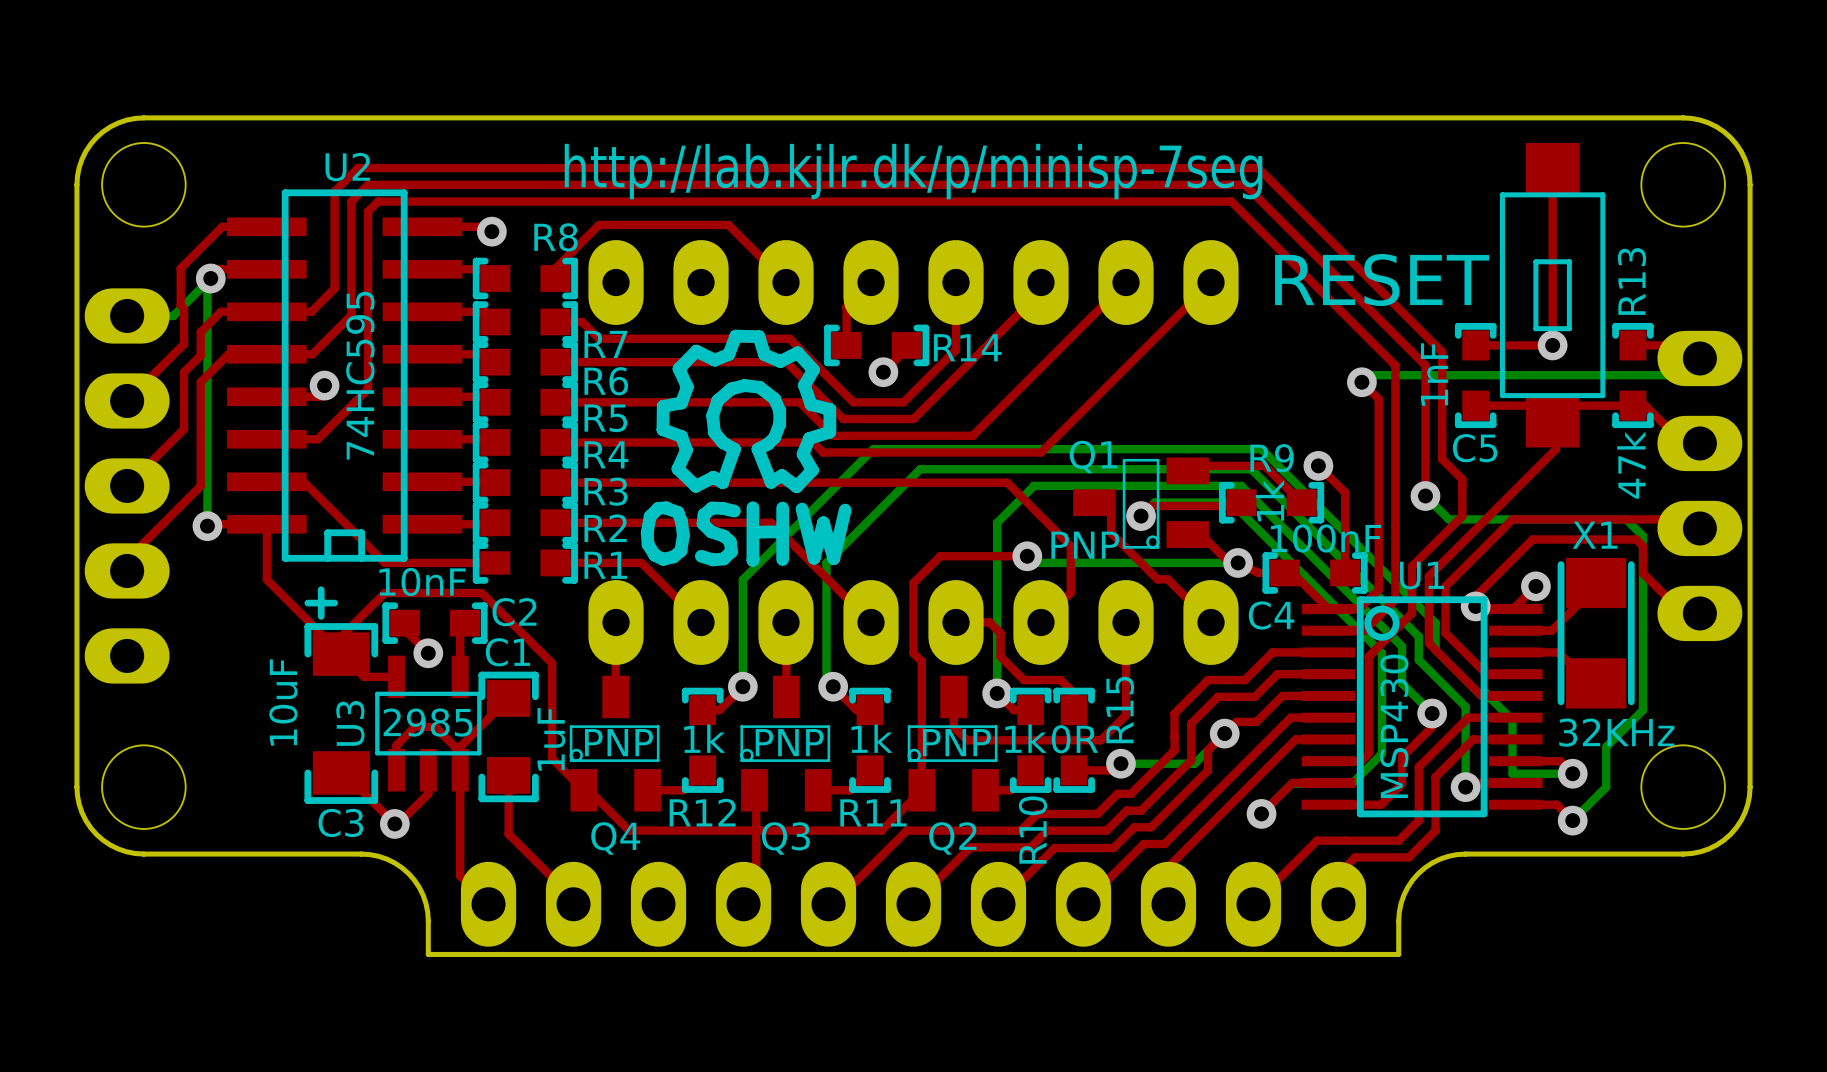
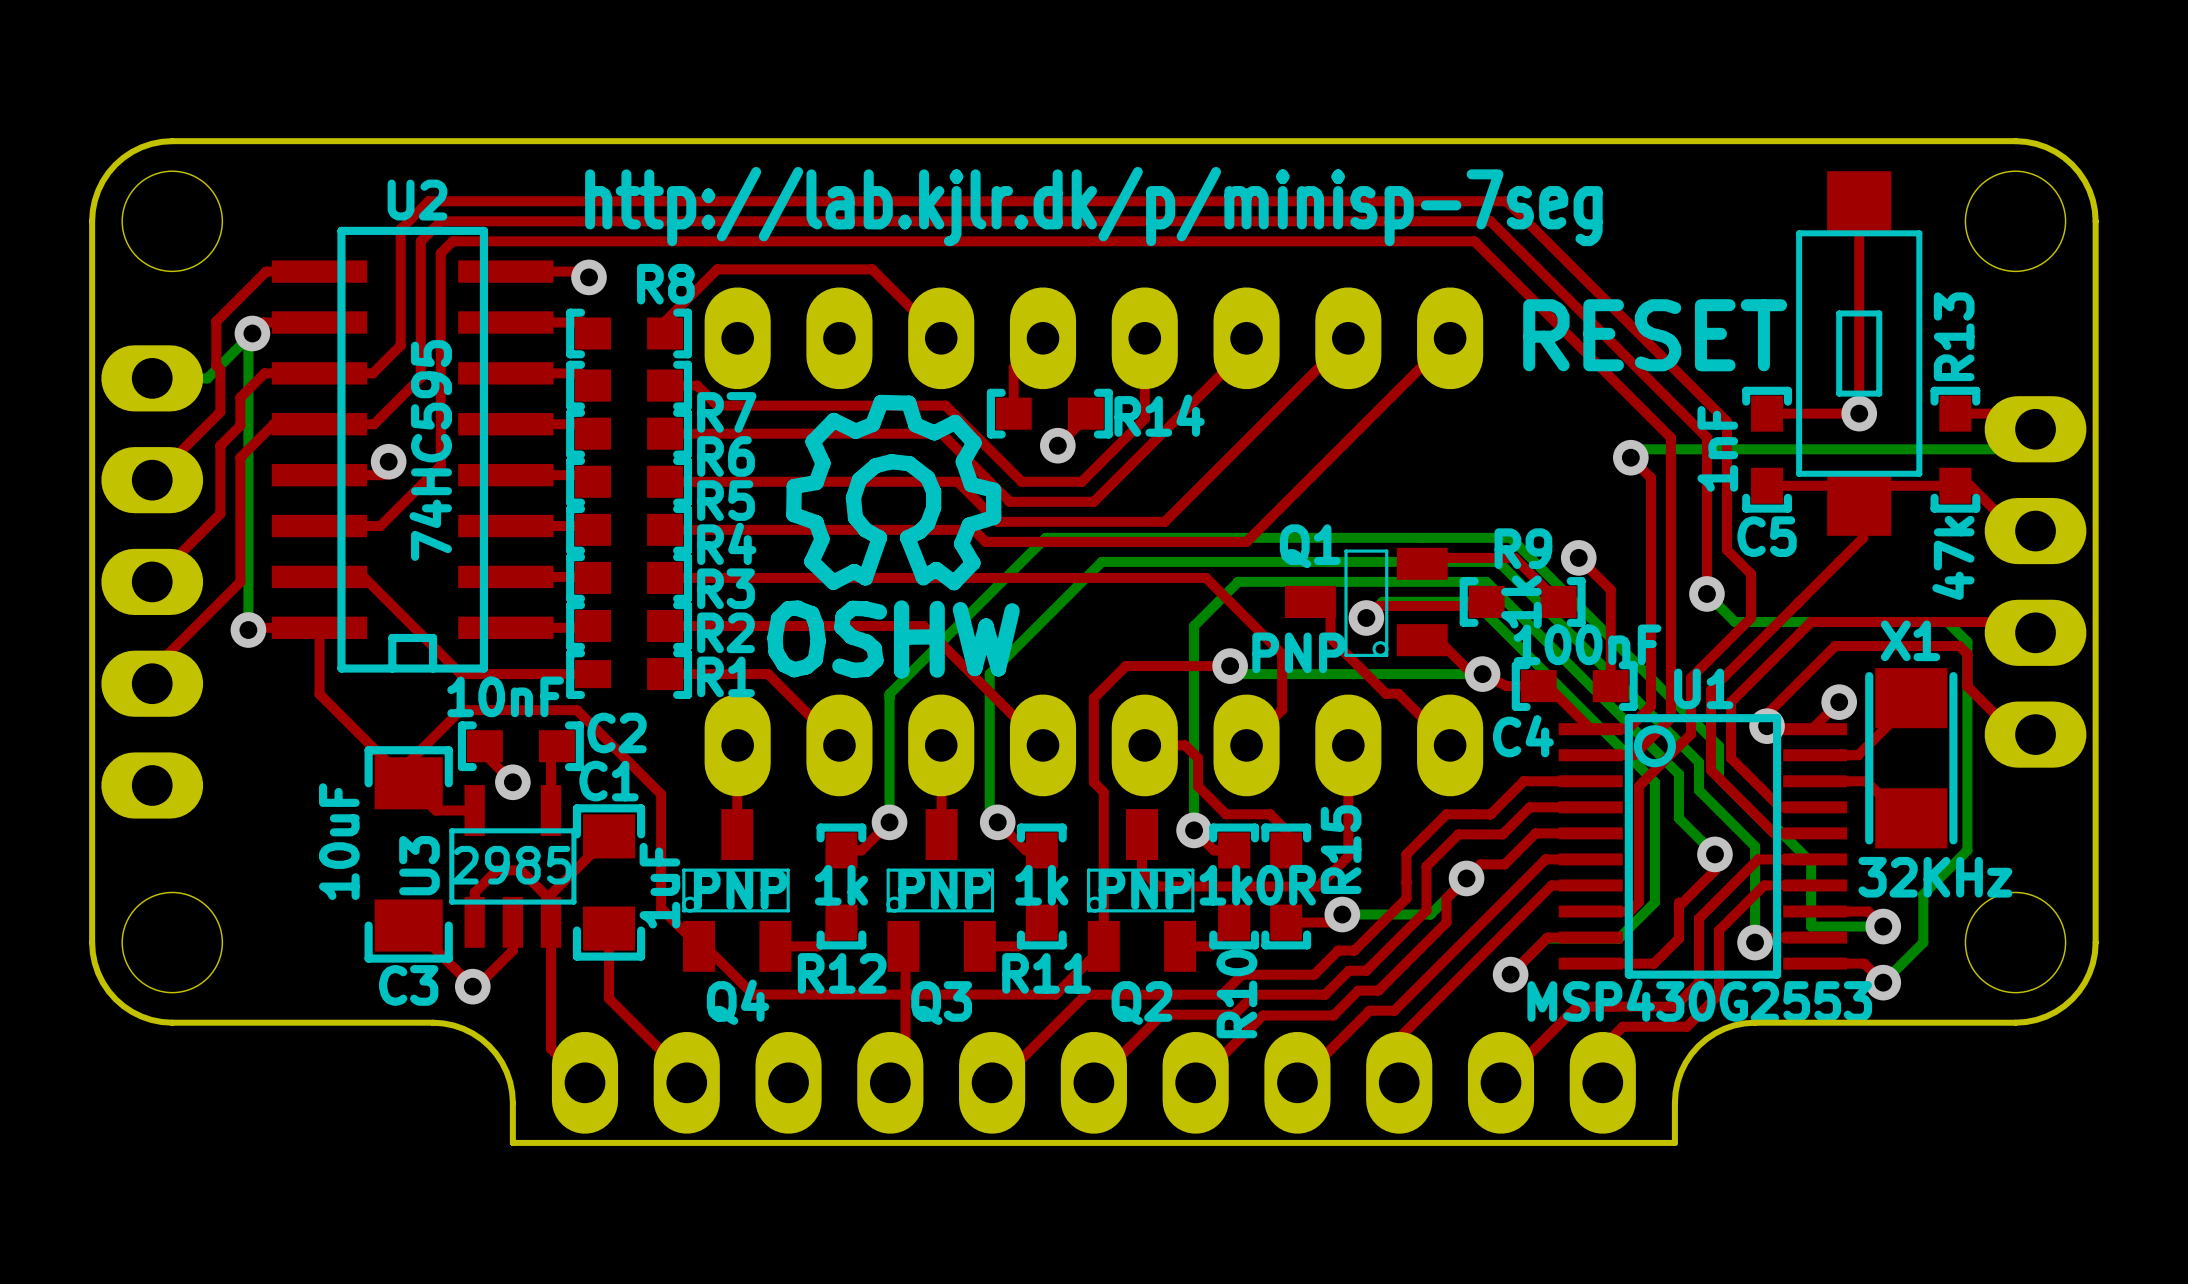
line: (321, 589) (321, 616) -> none
line: (307, 603) (334, 603) -> none
U1 value: MSP430 (1394, 726) -> MSP430G2553 (1699, 1000)

